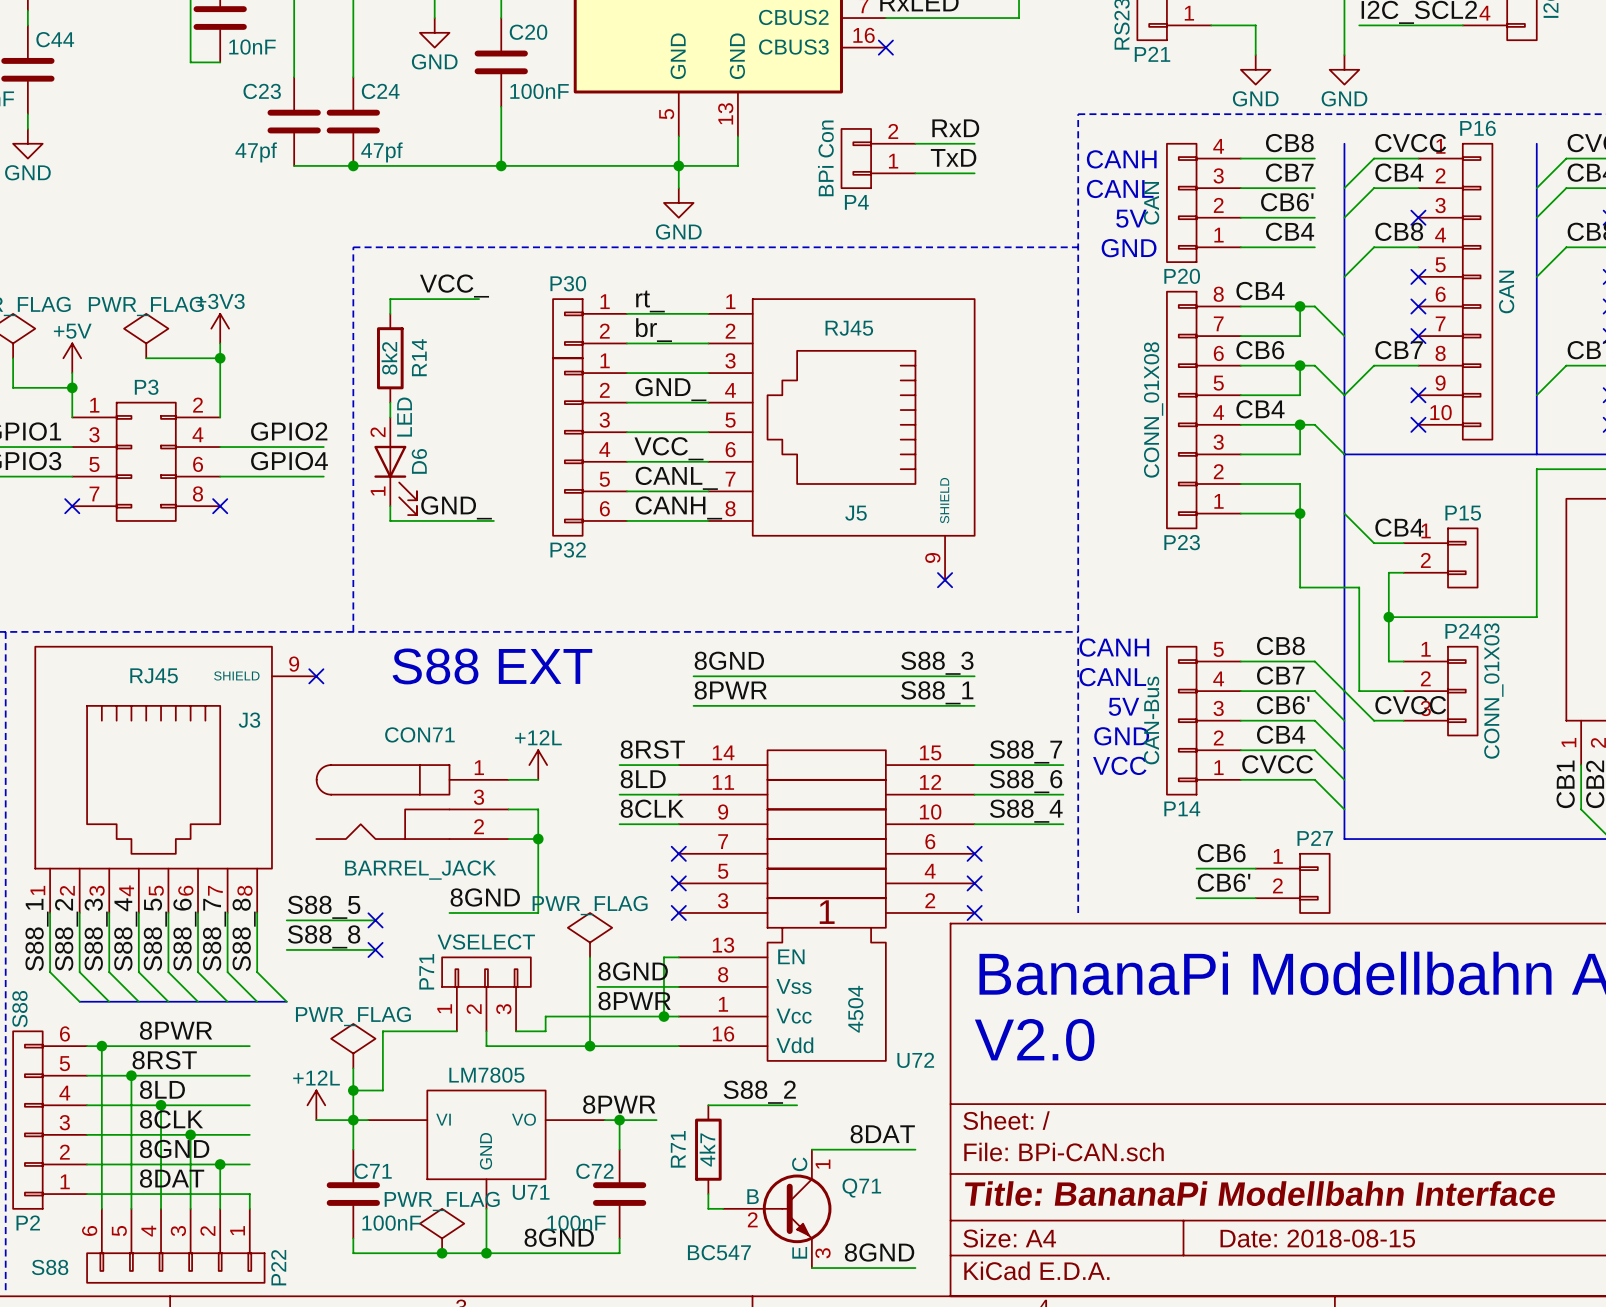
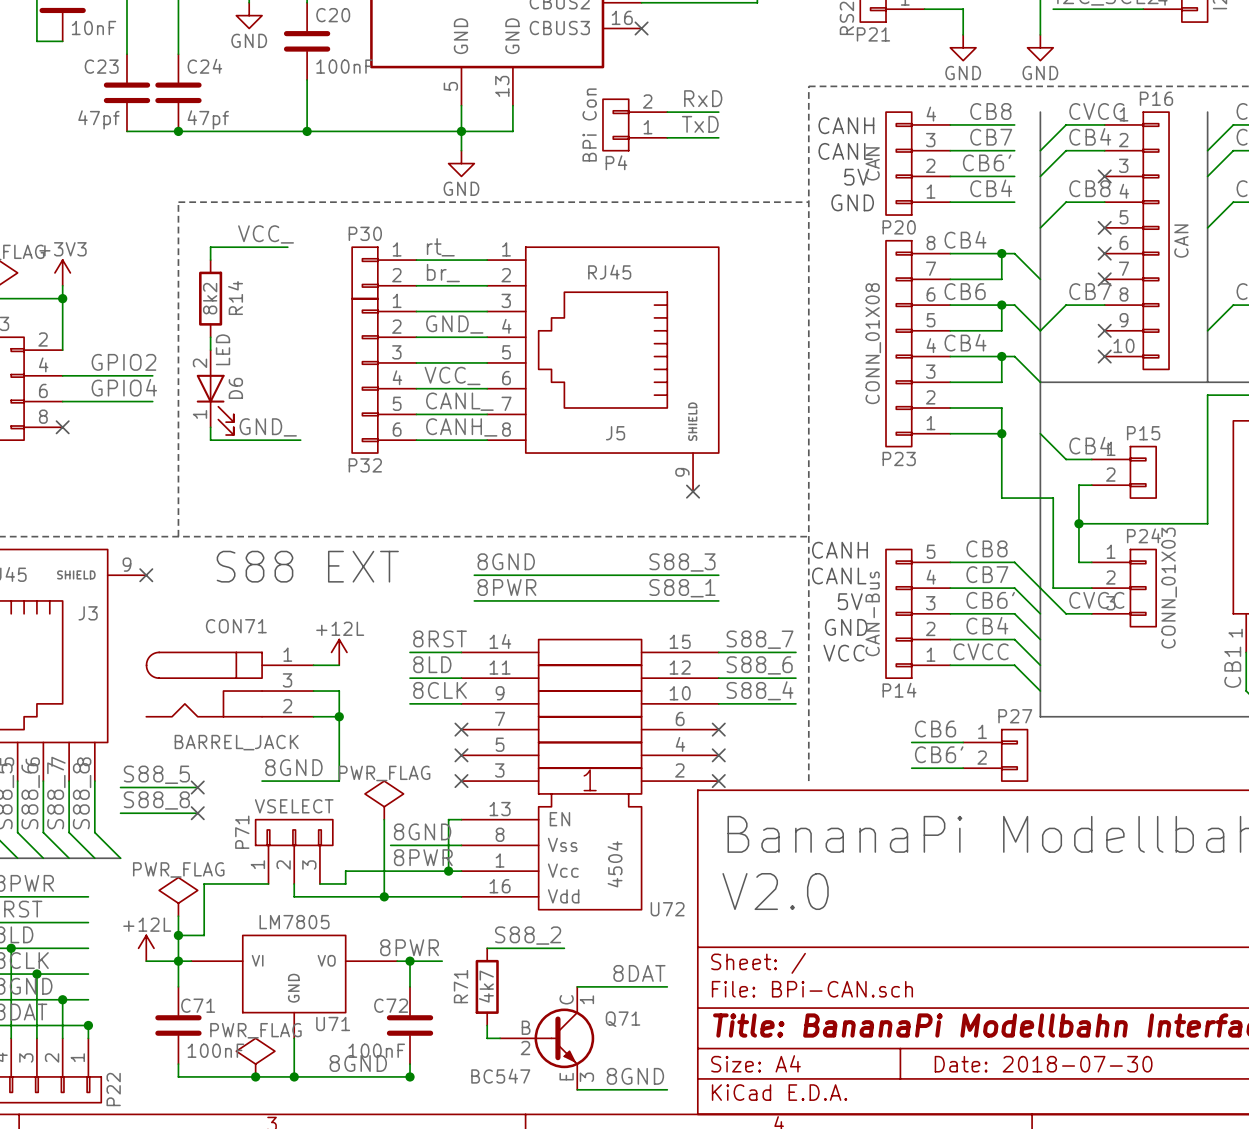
junction: none -> (88, 1025)
title block: Date: 2018-08-15 (1317, 1238) -> Date: 2018-07-30 (1043, 1064)
junction: none -> (410, 1076)

